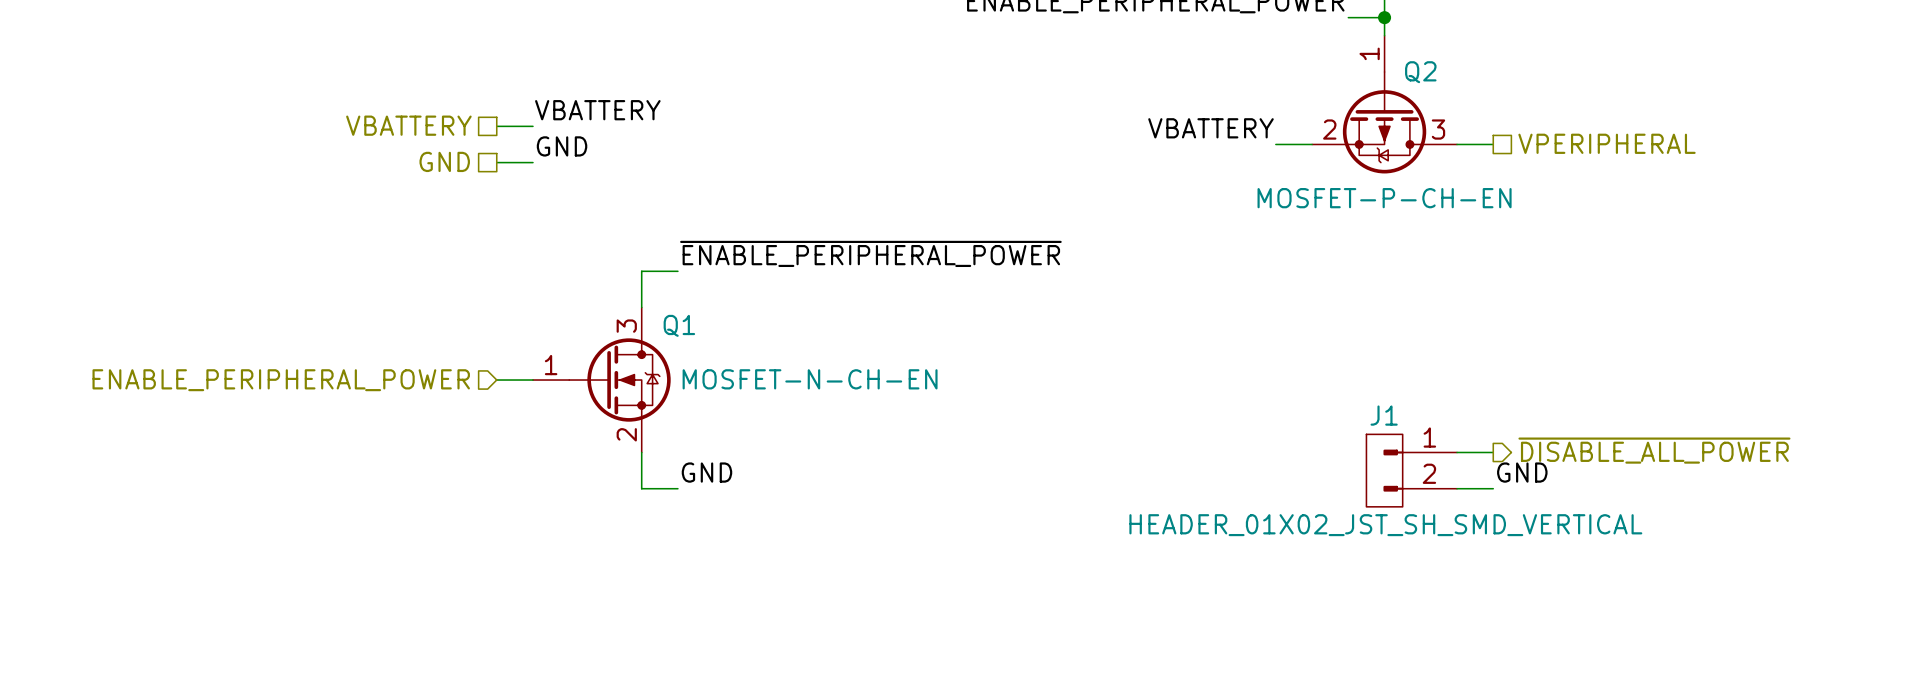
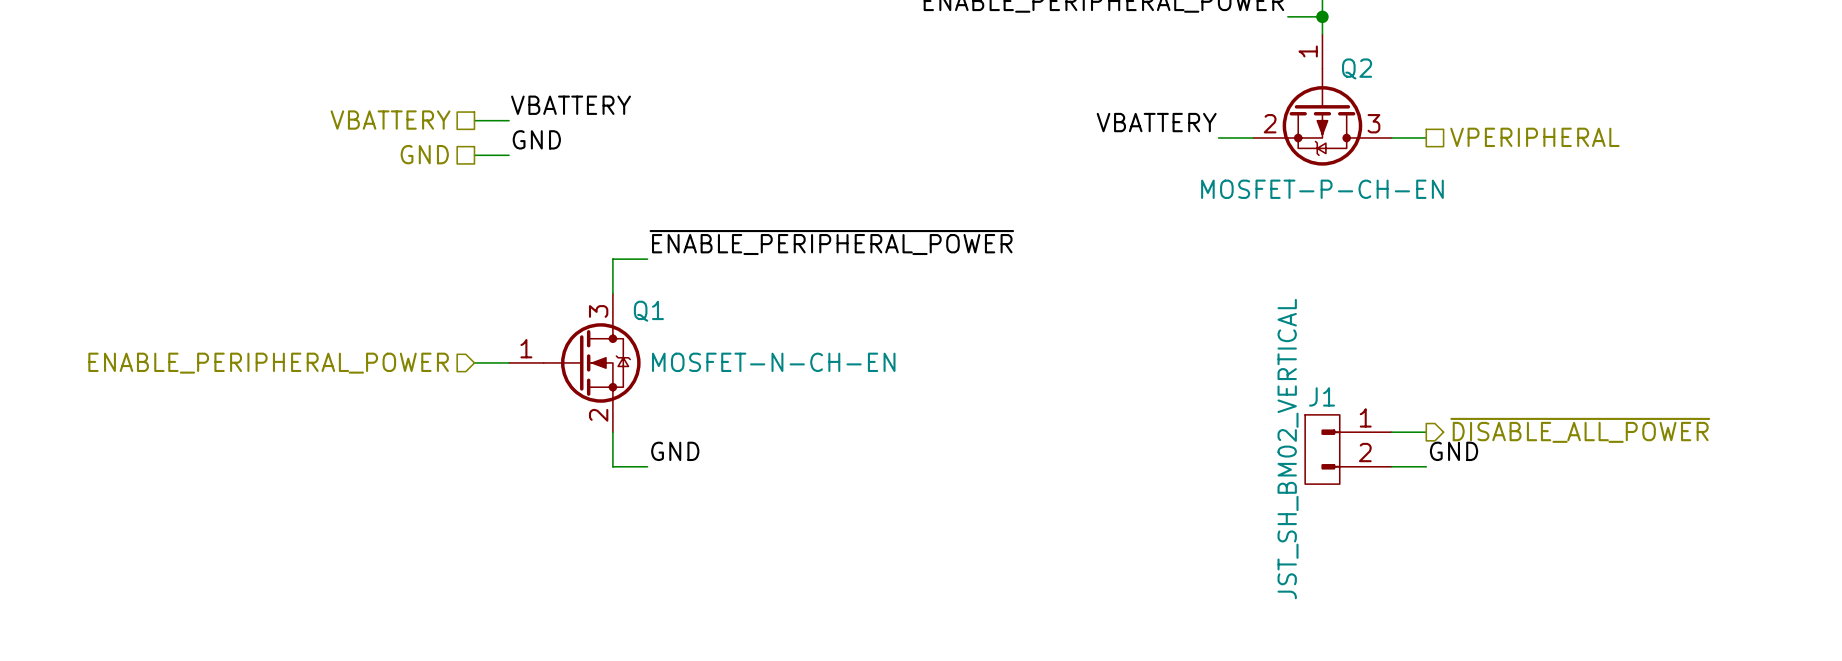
J1 value: HEADER_01X02_JST_SH_SMD_VERTICAL (1385, 525) -> JST_SH_BM02_VERTICAL (1288, 449)

